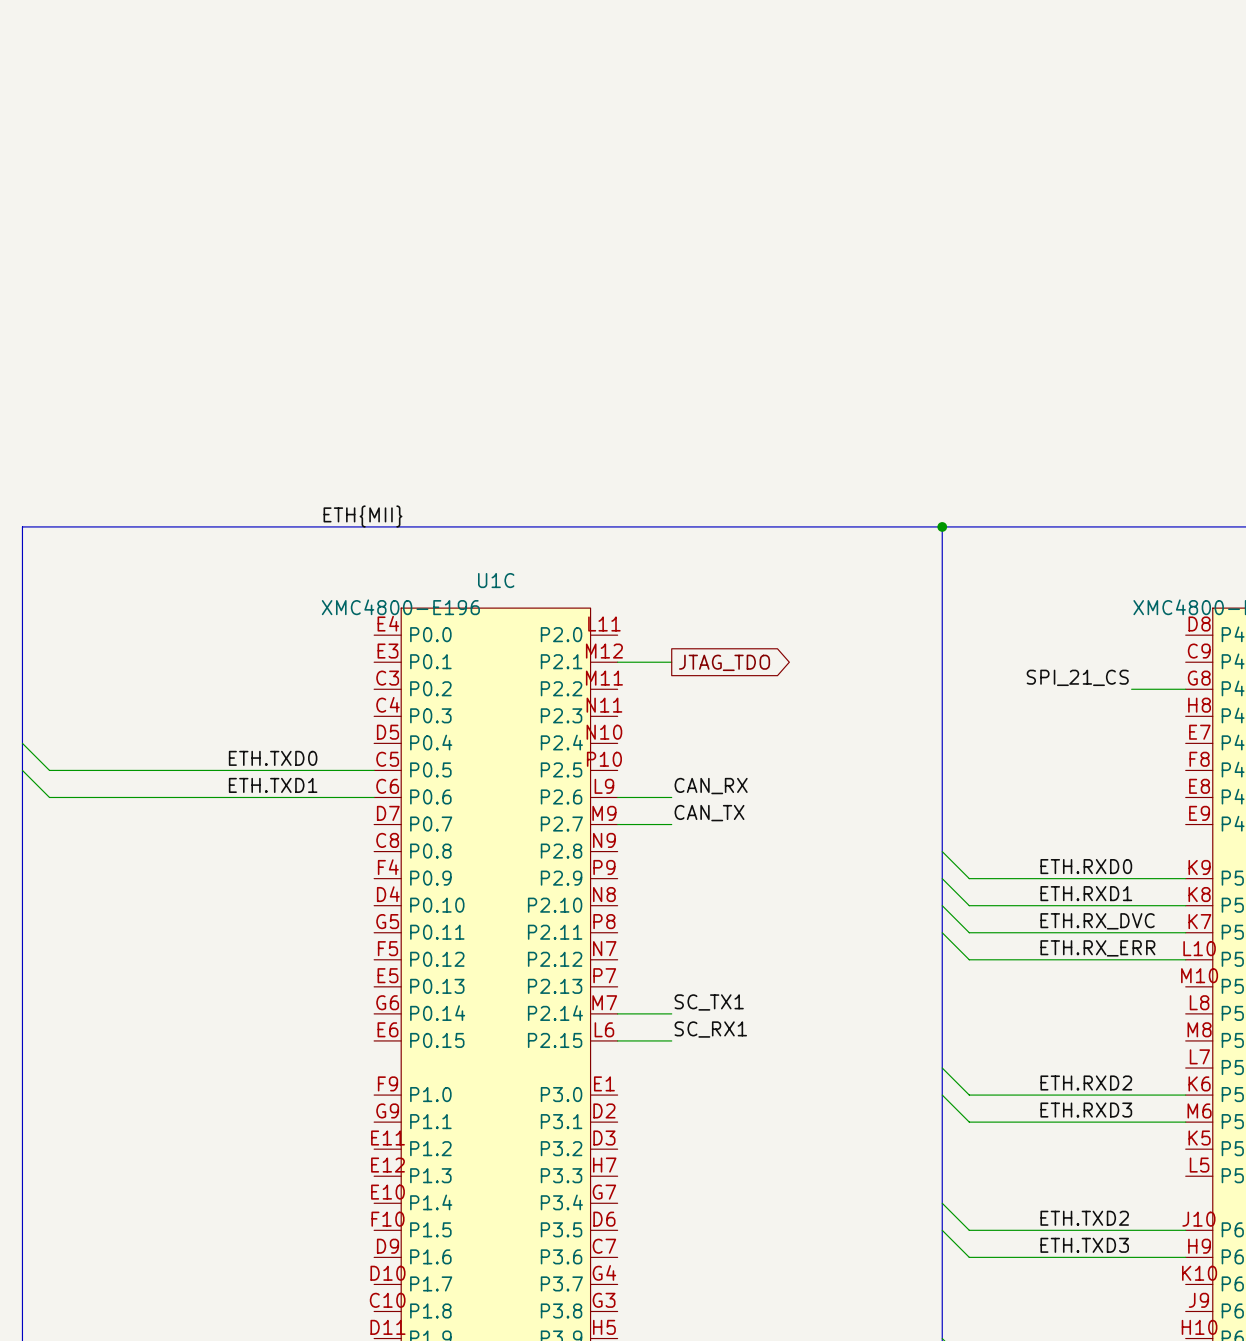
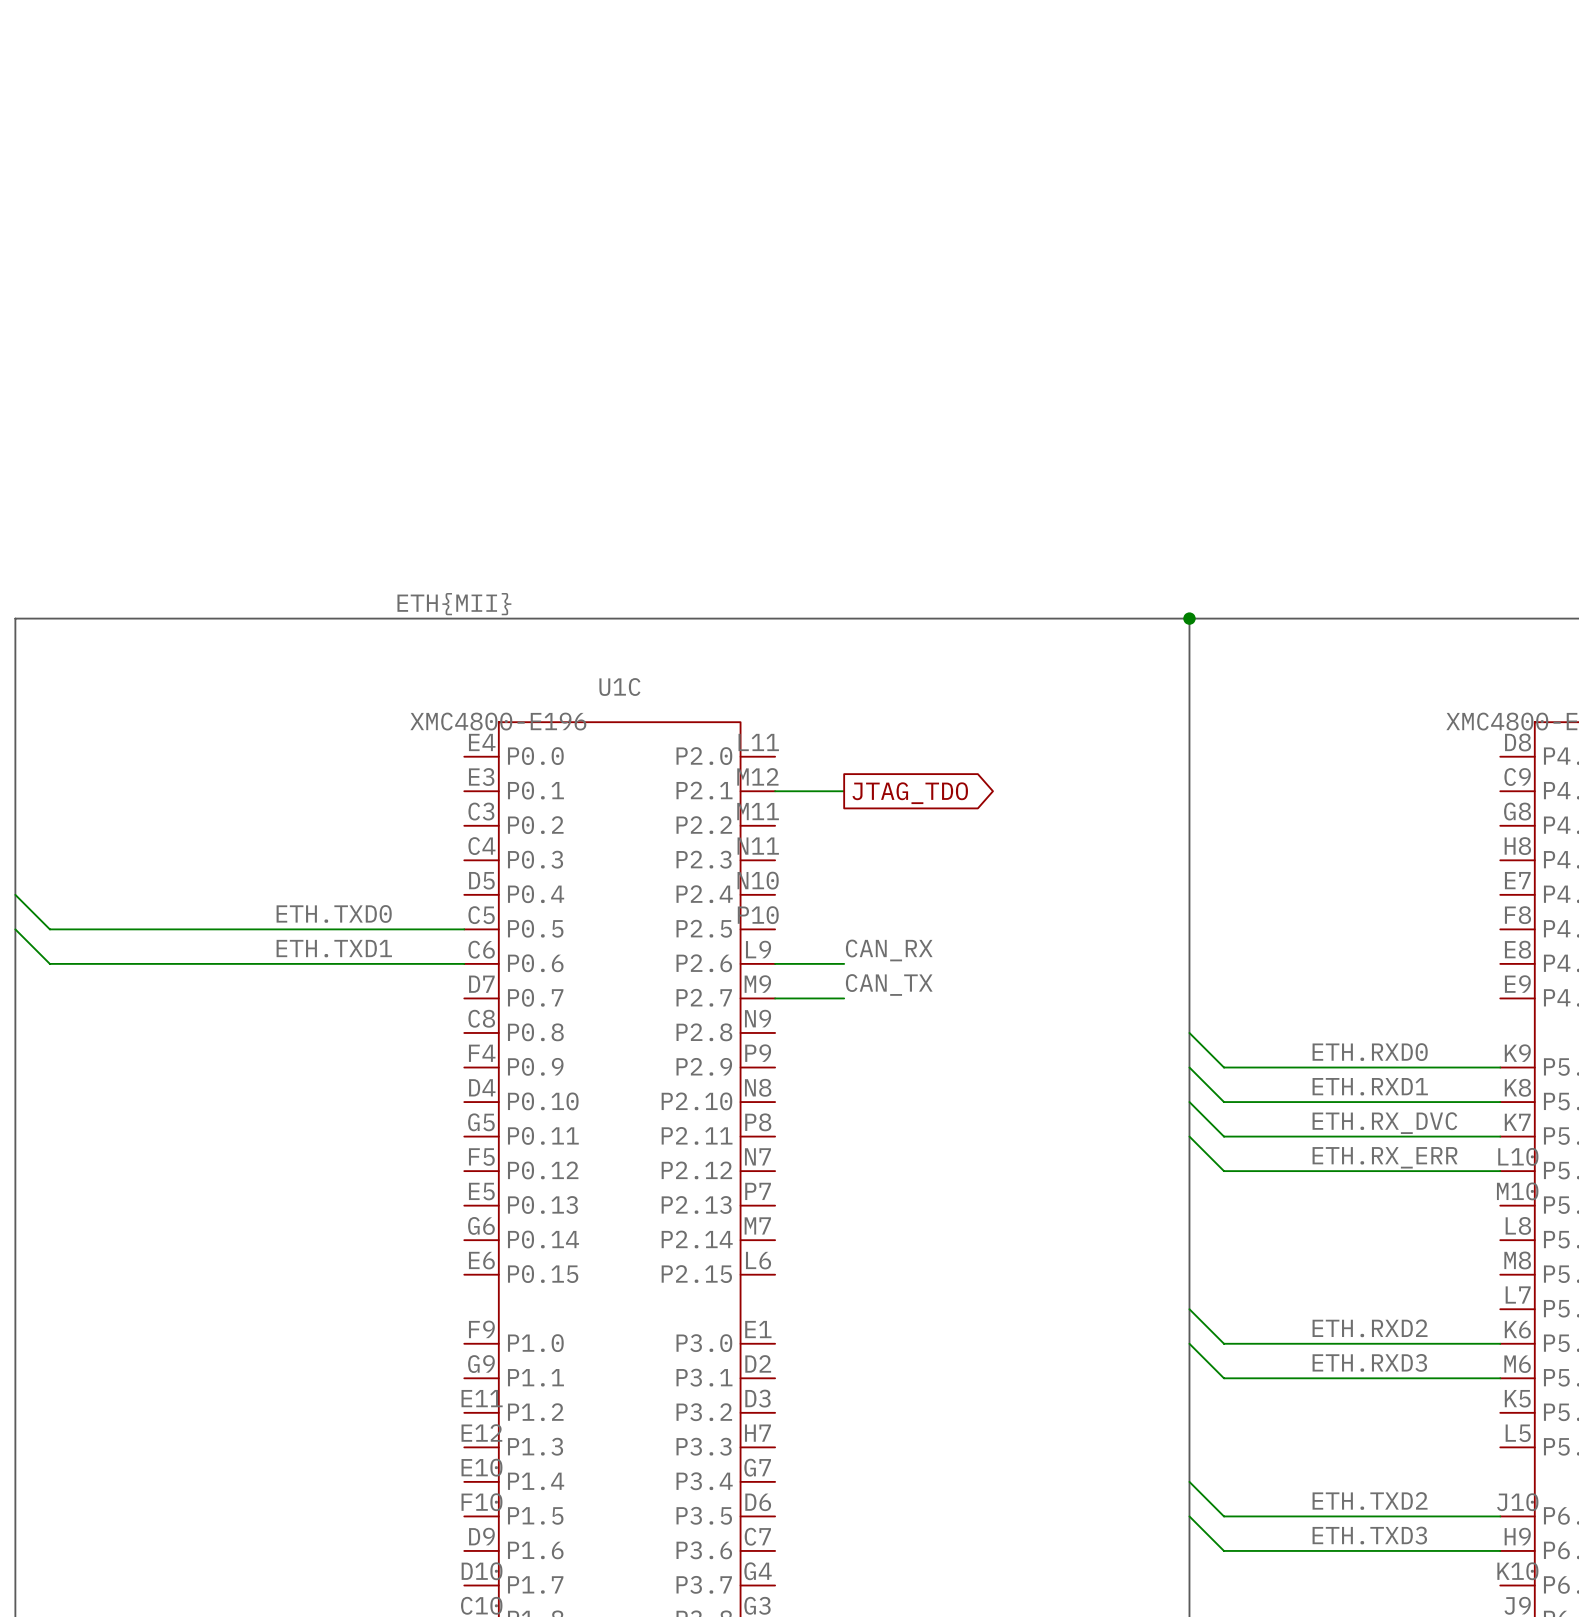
label: SPI_21_CS (1077, 677) -> none
wire: (1131, 689) (1185, 689) -> none
label: SC_TX1 (709, 1002) -> none
wire: (617, 1013) (671, 1013) -> none
label: SC_RX1 (710, 1029) -> none
wire: (617, 1040) (671, 1040) -> none

